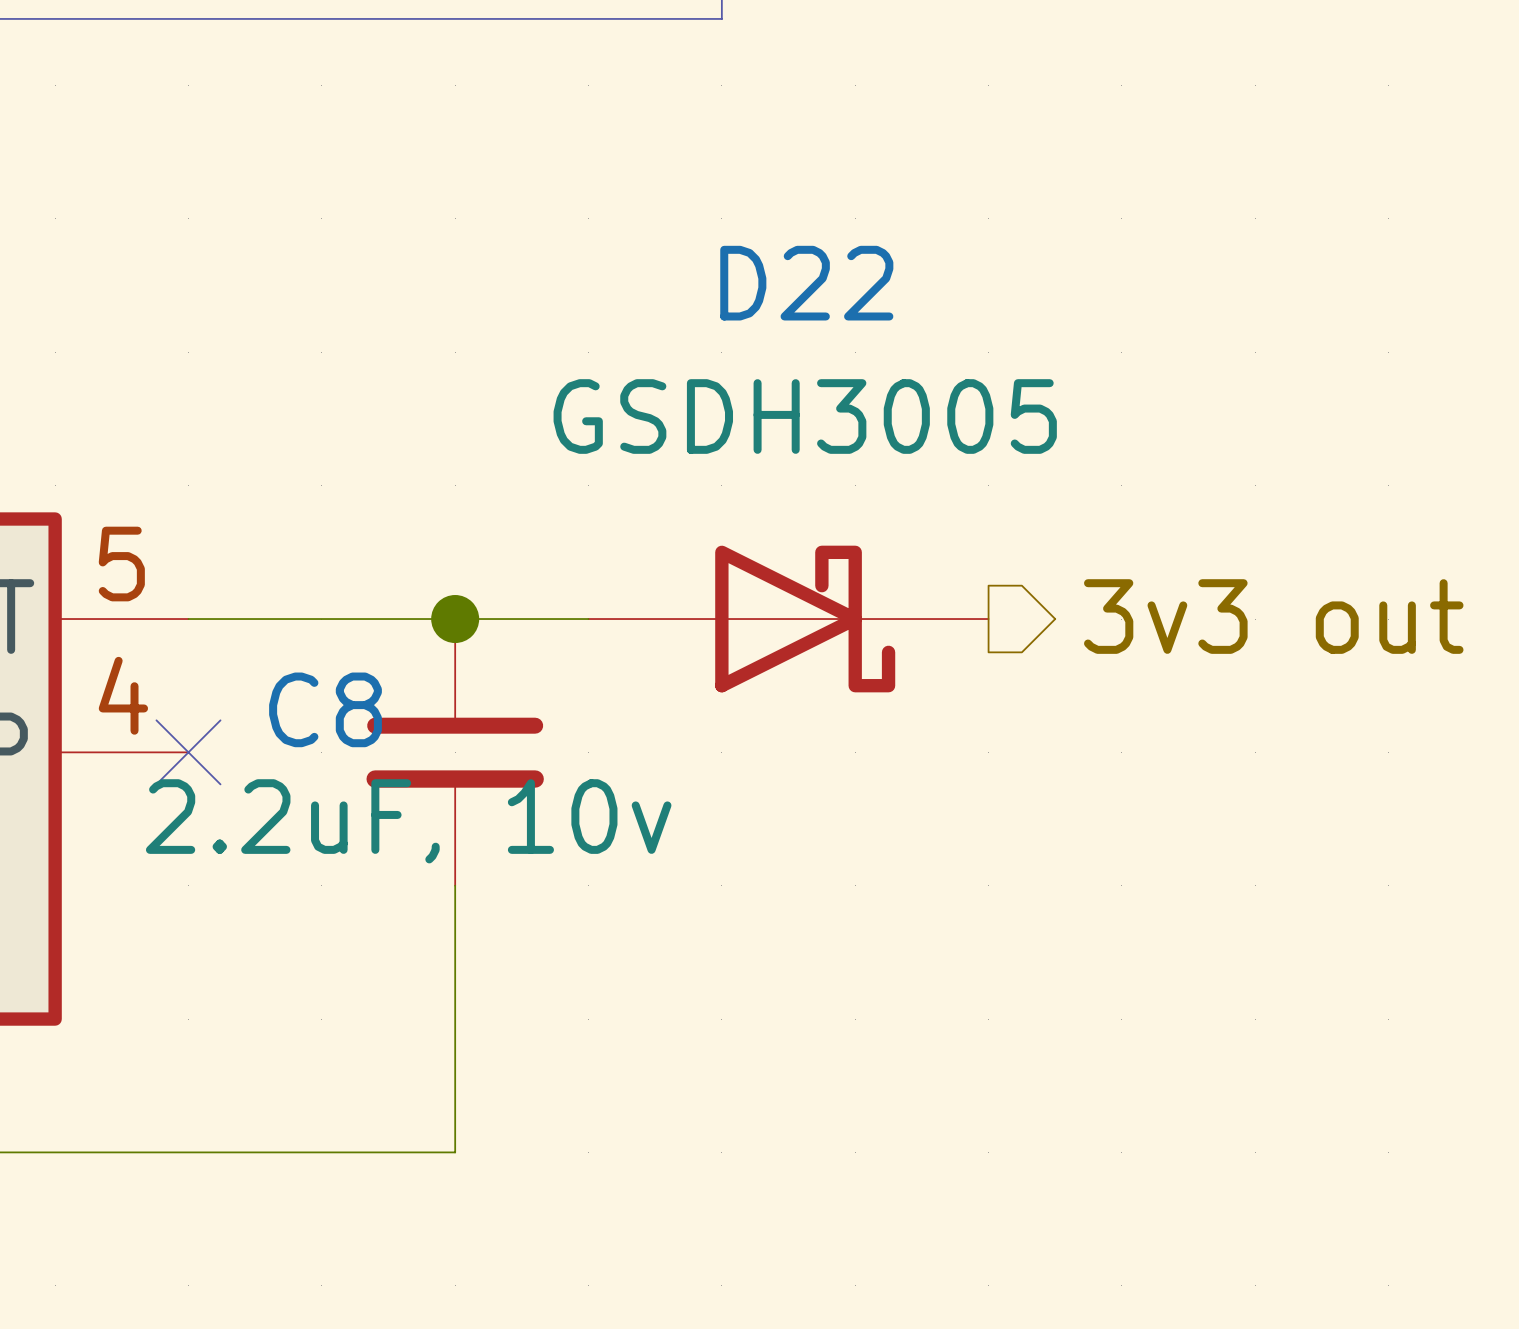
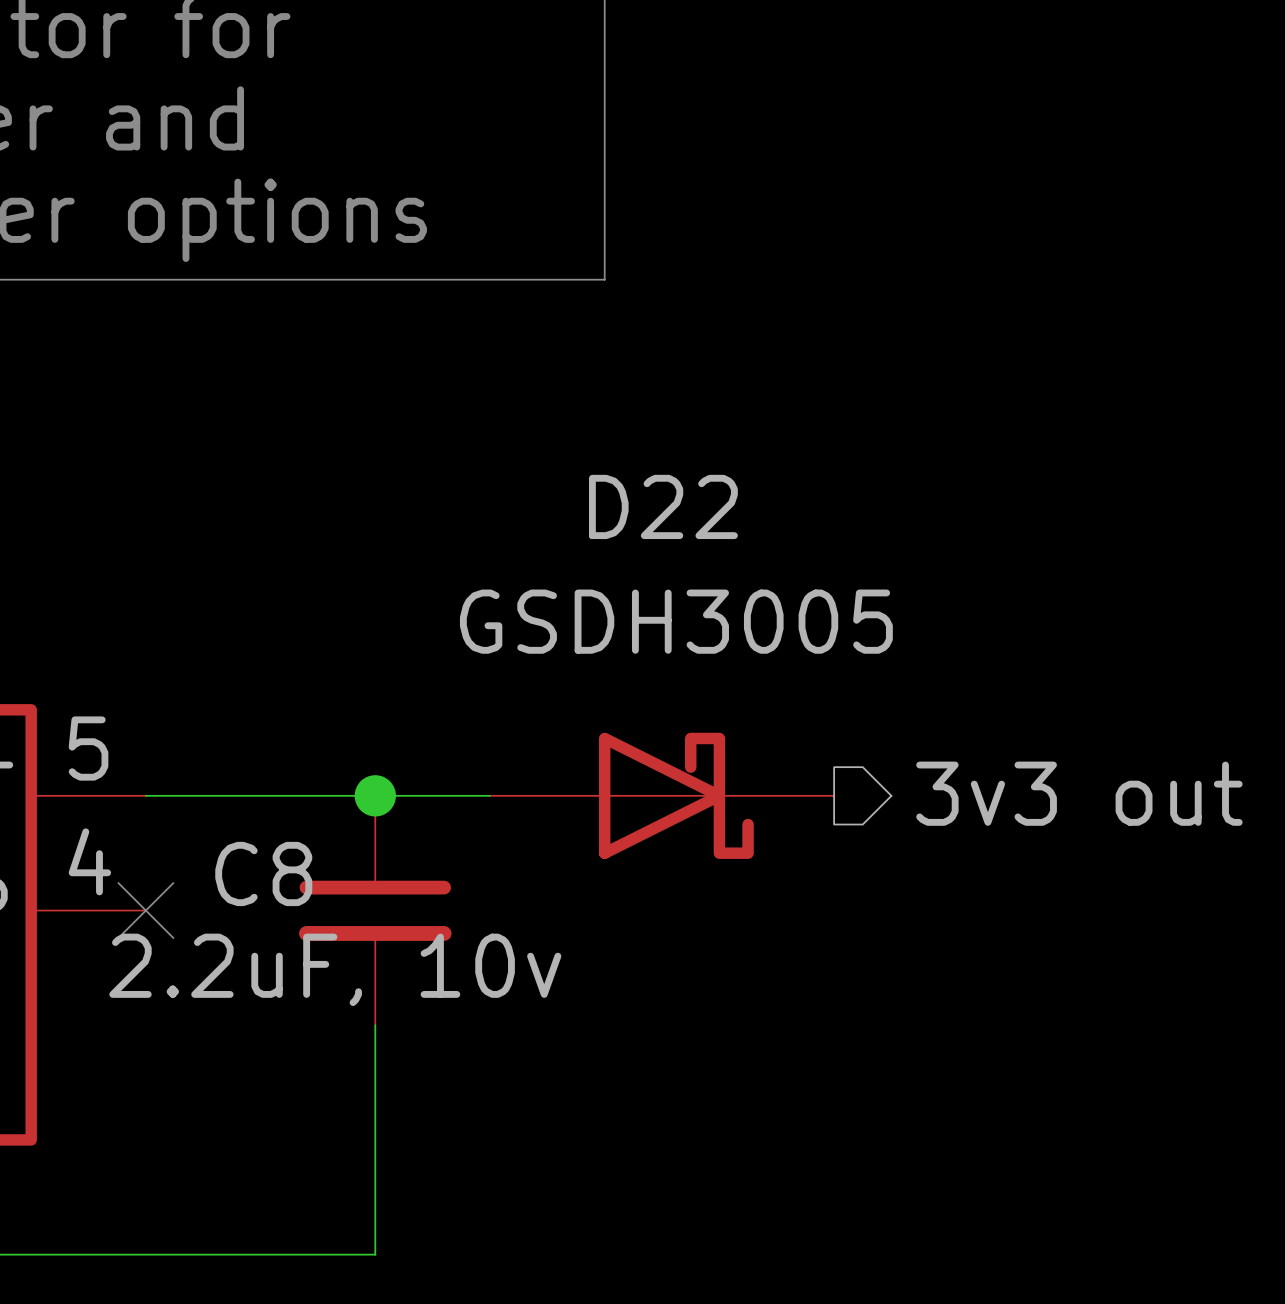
D22 name position: D22 (806, 283) -> D22 (663, 506)

